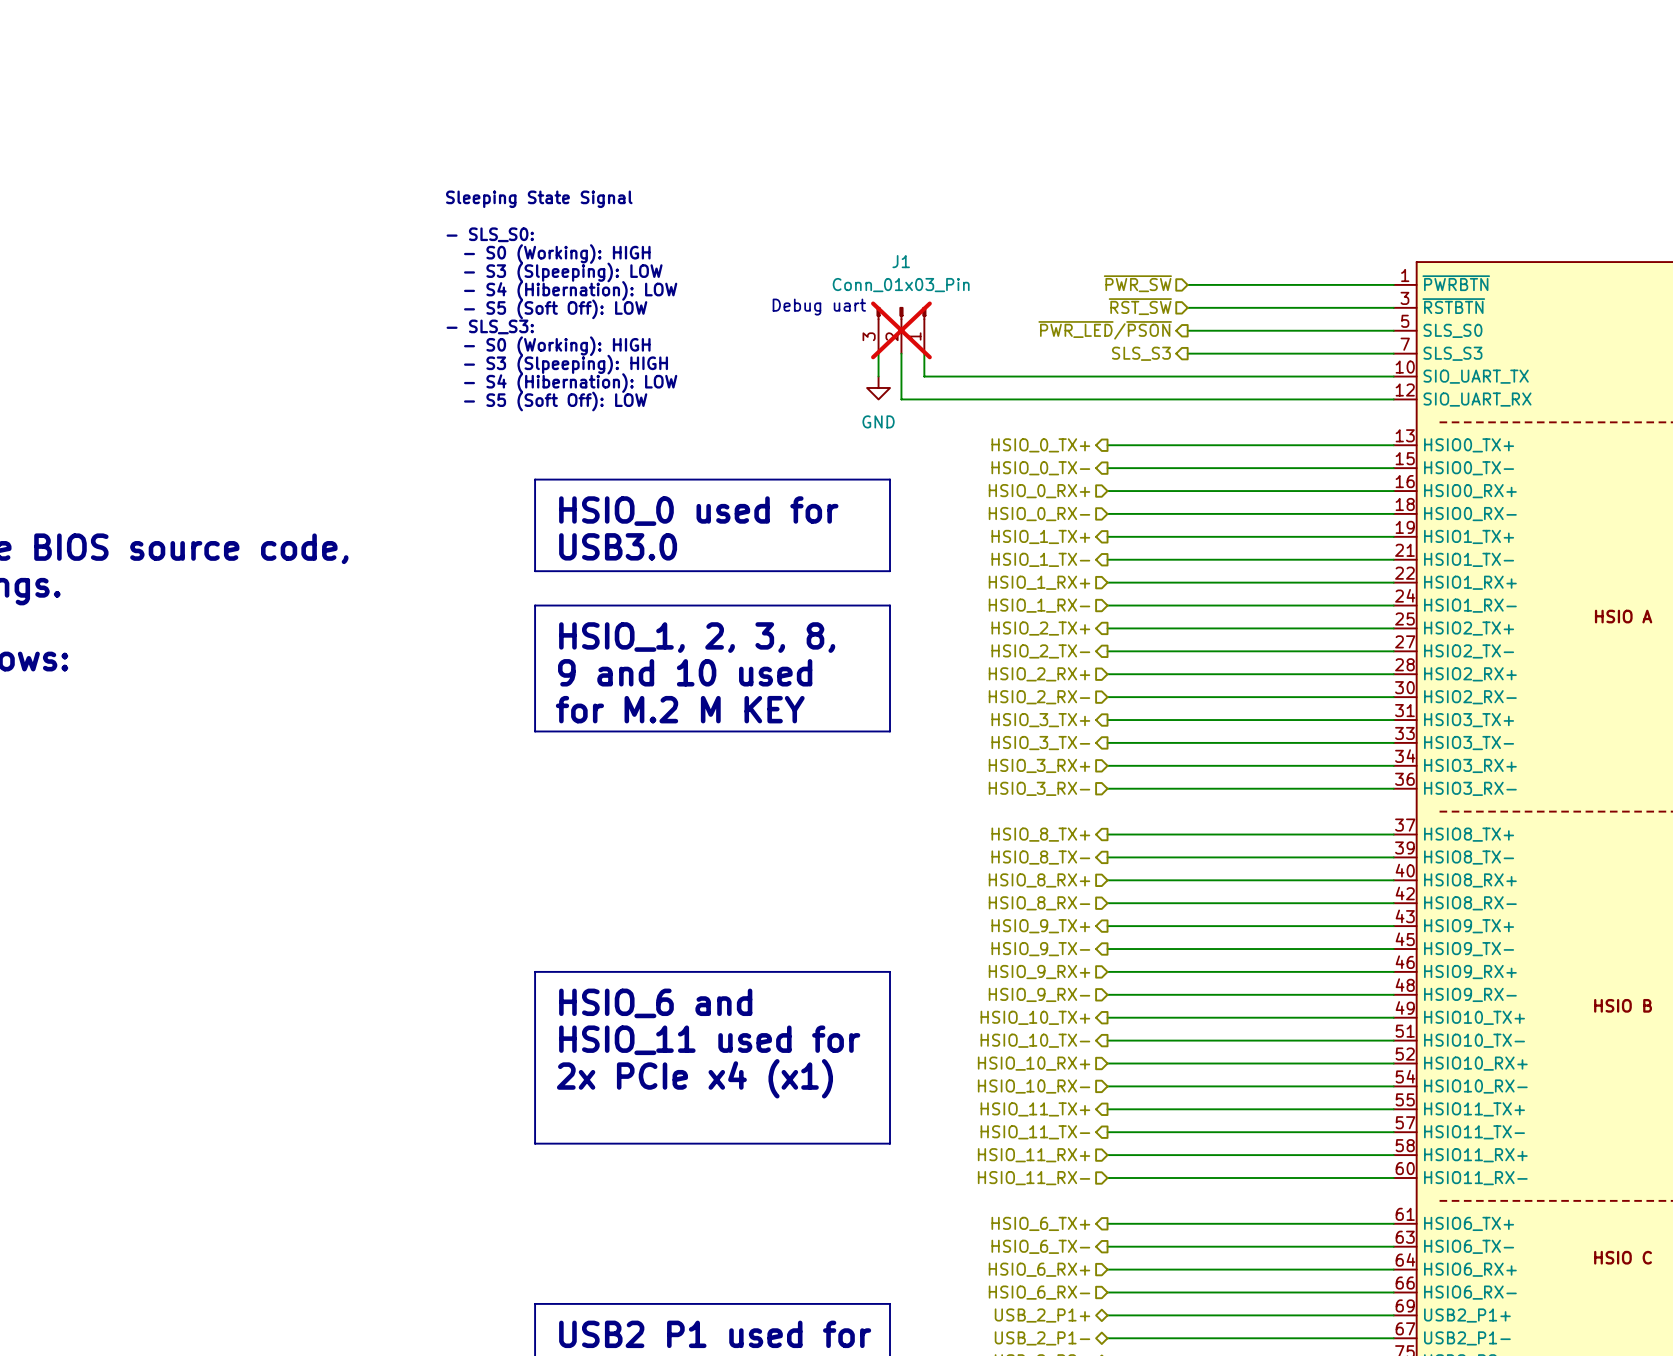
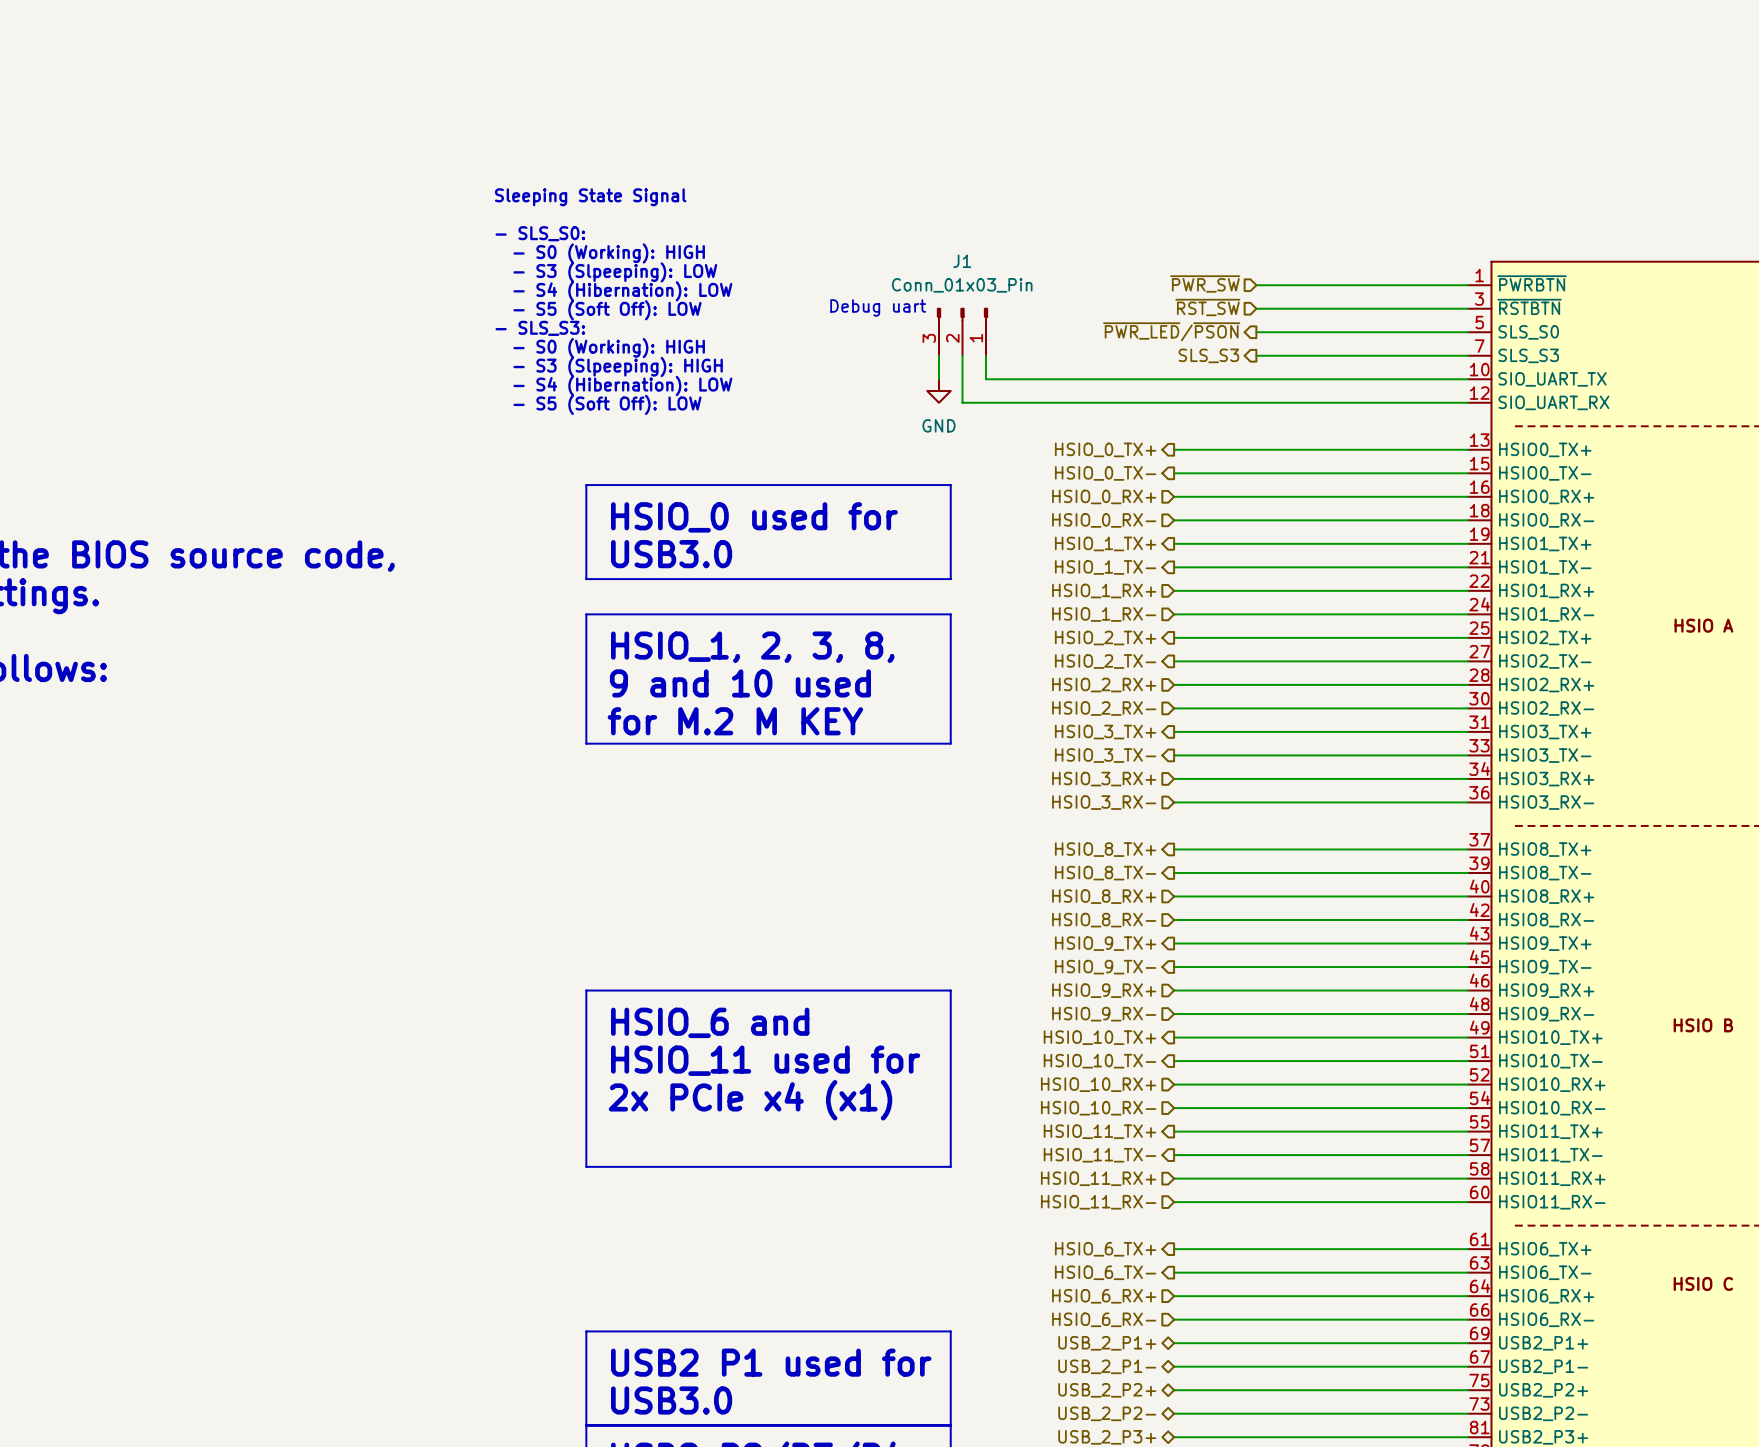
J1 do-not-place cross: (901, 330) -> none

